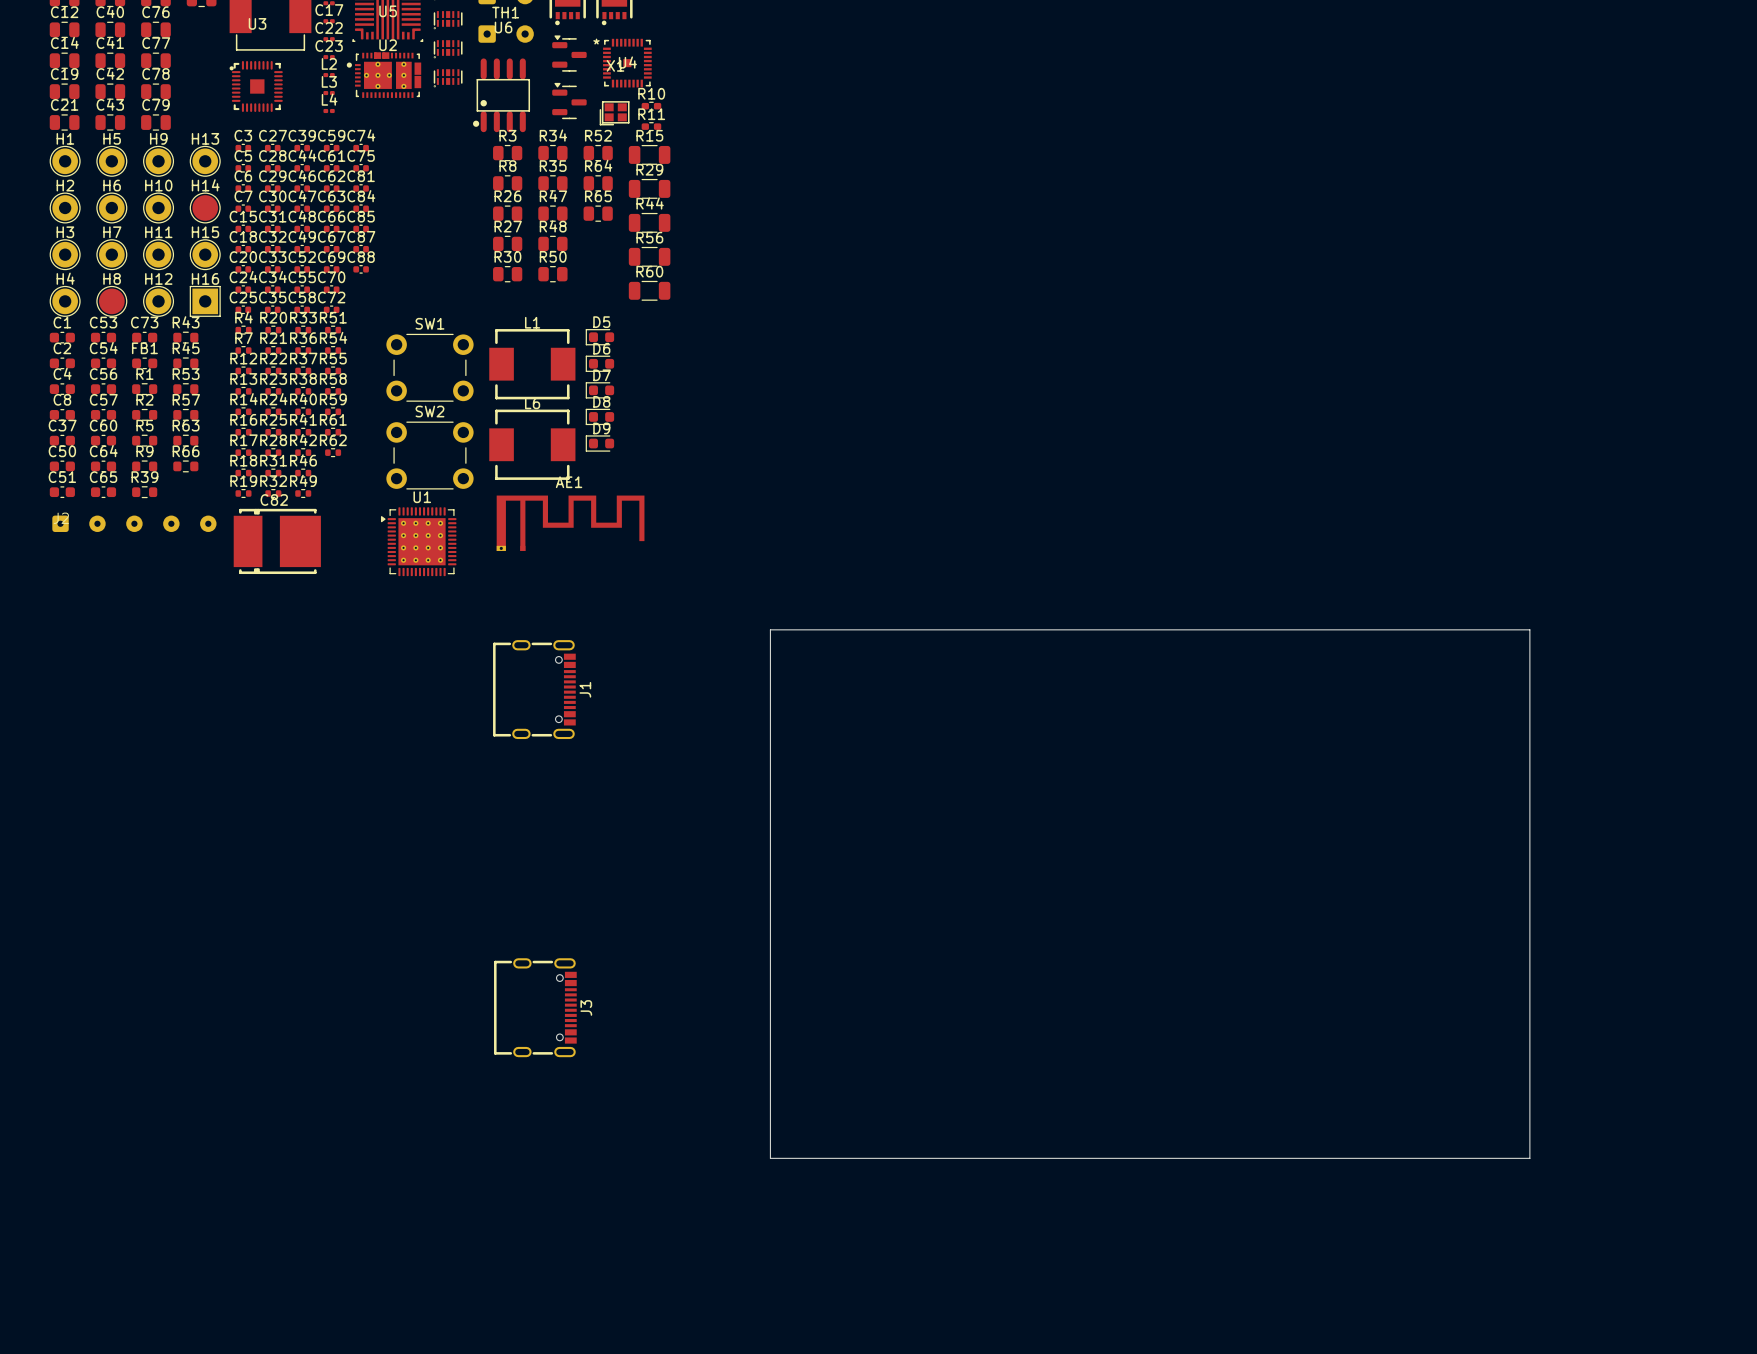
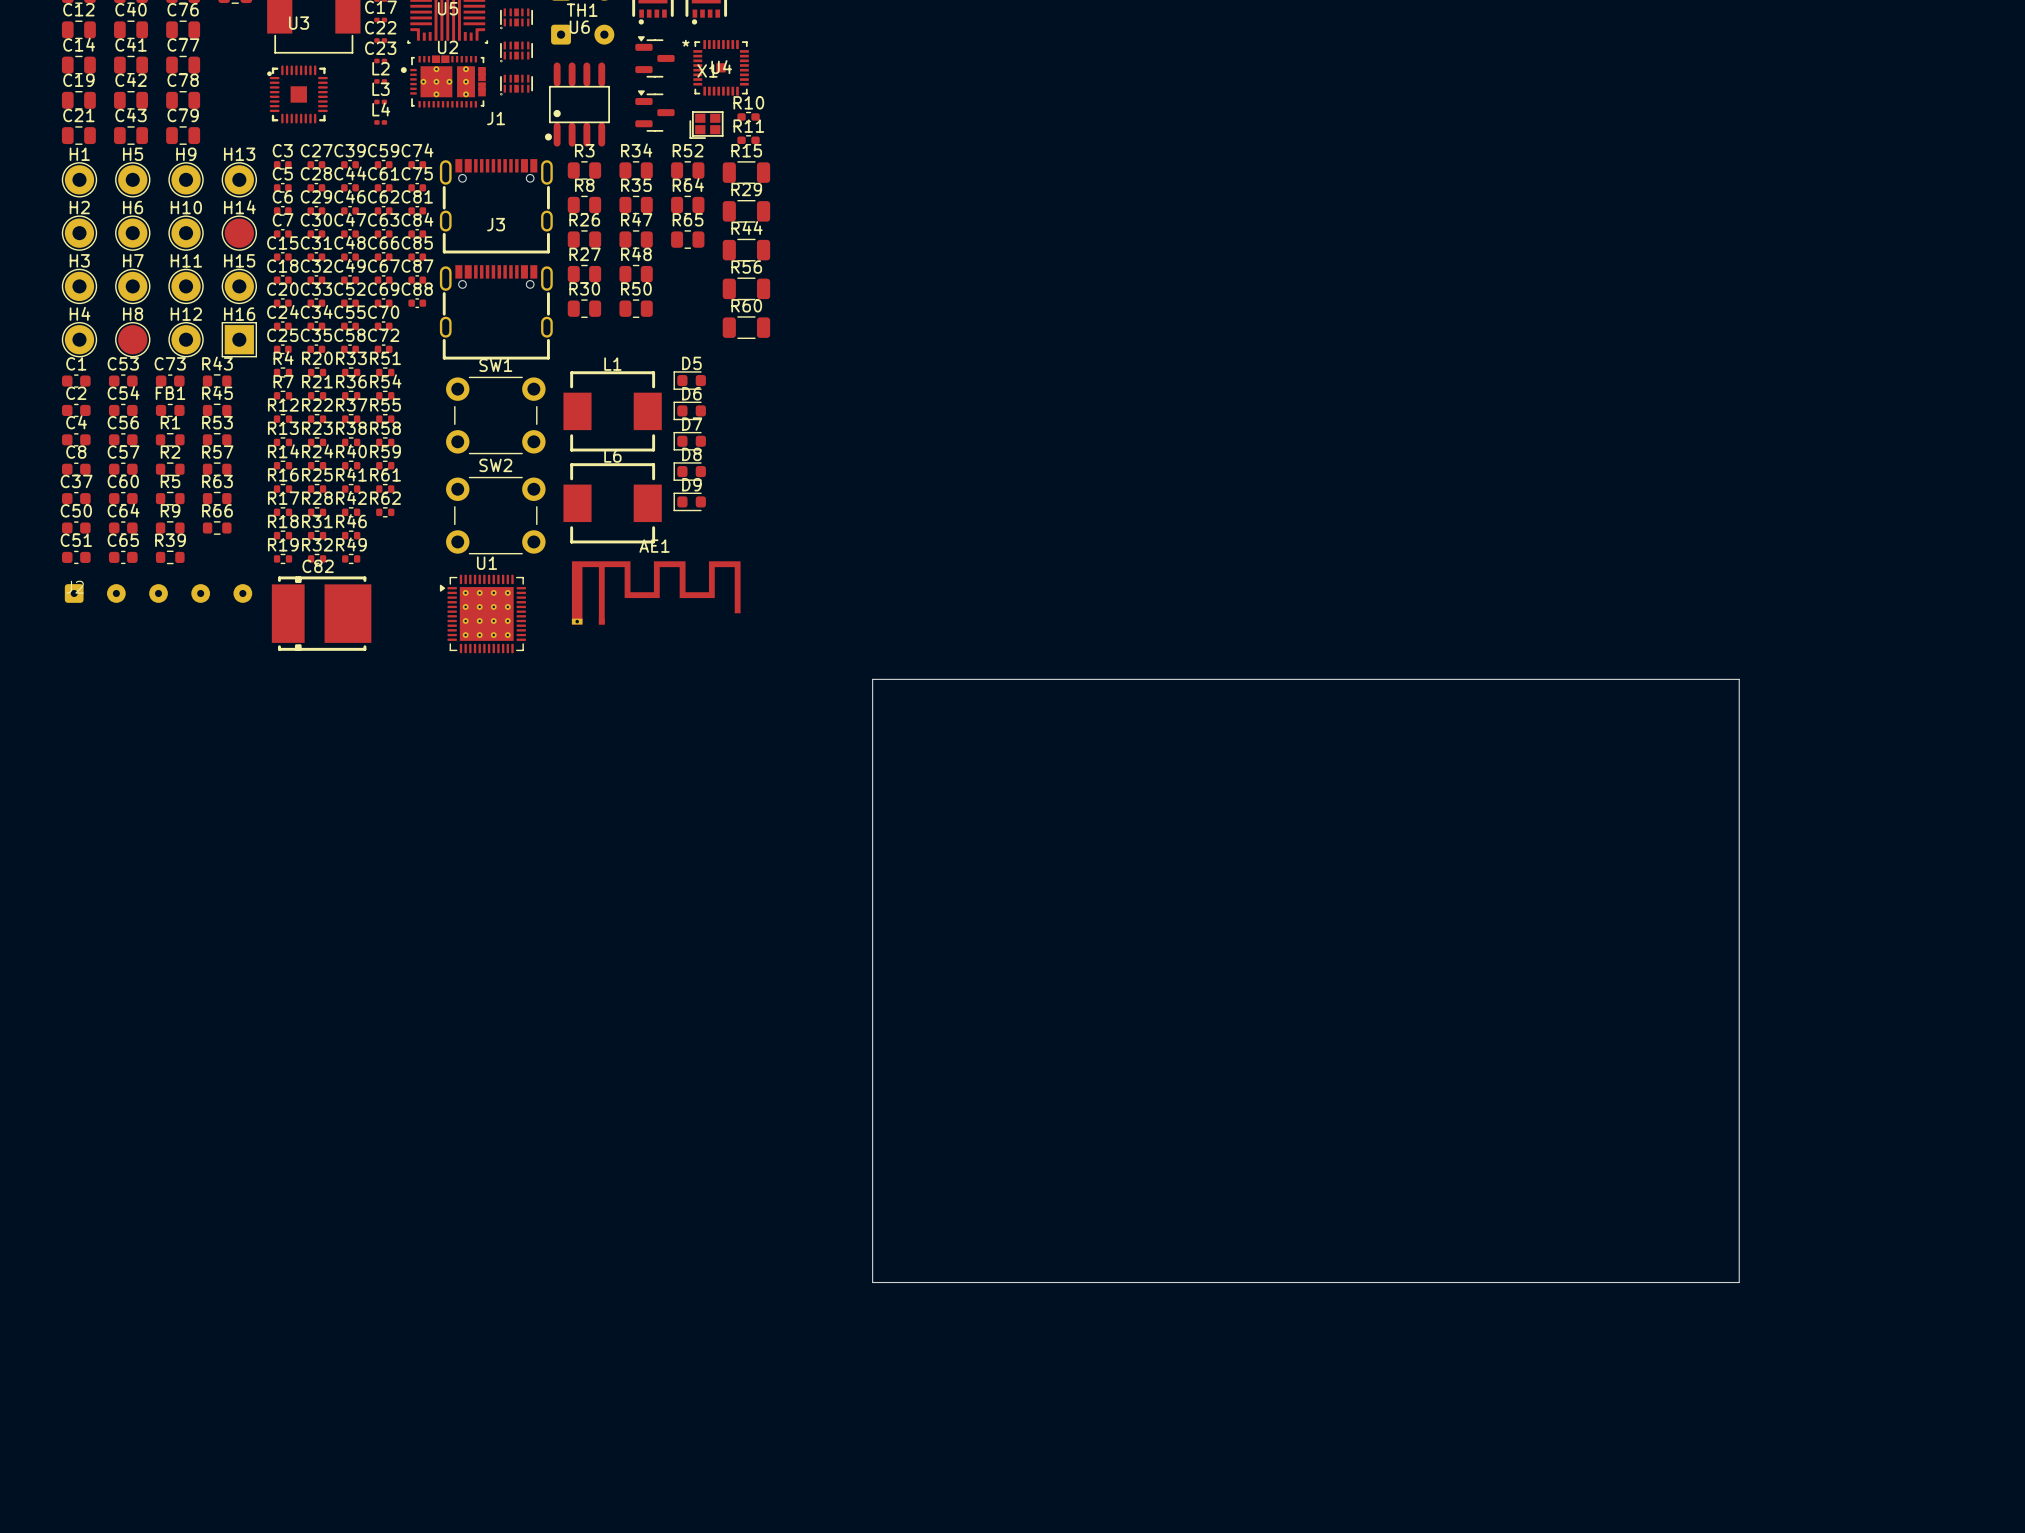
board edge: (770, 629) (1529, 629) (1529, 1158) (770, 1158) (770, 629) -> (872, 679) (872, 1282) (1739, 1282) (1739, 679) (872, 679)
J1 rotation: 0° (534, 689) -> 90° counterclockwise (496, 206)
J1 position: (534, 689) -> (496, 206)
J1 name position: J1 (585, 689) -> J1 (496, 118)
J3 rotation: 0° (535, 1007) -> 90° counterclockwise (496, 312)
J3 position: (535, 1007) -> (496, 312)
J3 name position: J3 (586, 1007) -> J3 (496, 224)

